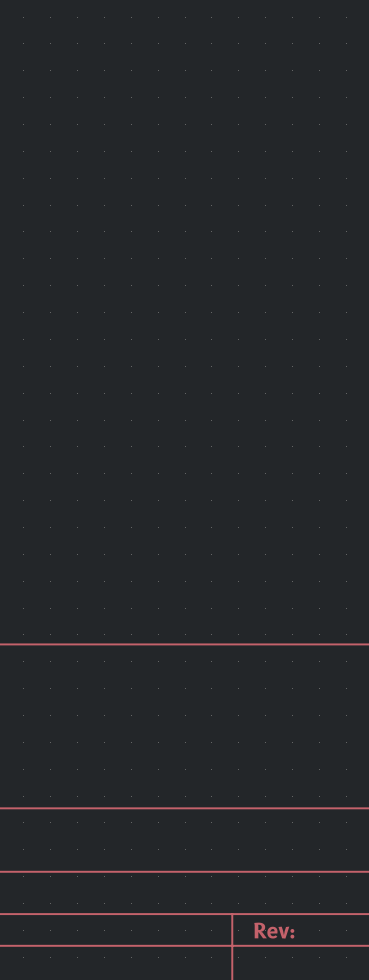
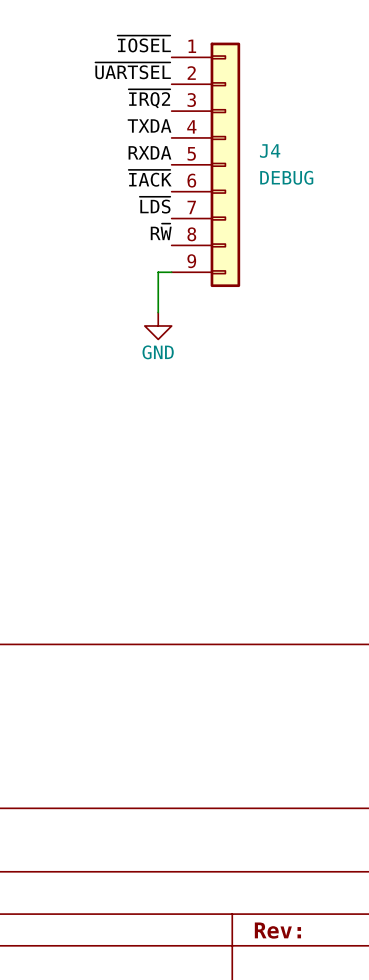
label: none -> ~{IOSEL} (144, 43)
label: none -> ~{UARTSEL} (133, 70)
label: none -> ~{IRQ2} (149, 98)
label: none -> TXDA (149, 125)
label: none -> RXDA (149, 152)
J4: none -> DEBUG (205, 164)
label: none -> ~{IACK} (150, 178)
label: none -> ~{LDS} (155, 205)
label: none -> R~{W} (161, 231)
wire: none -> (171, 272) (158, 272) (158, 312)
power symbol: none -> GND (158, 325)

